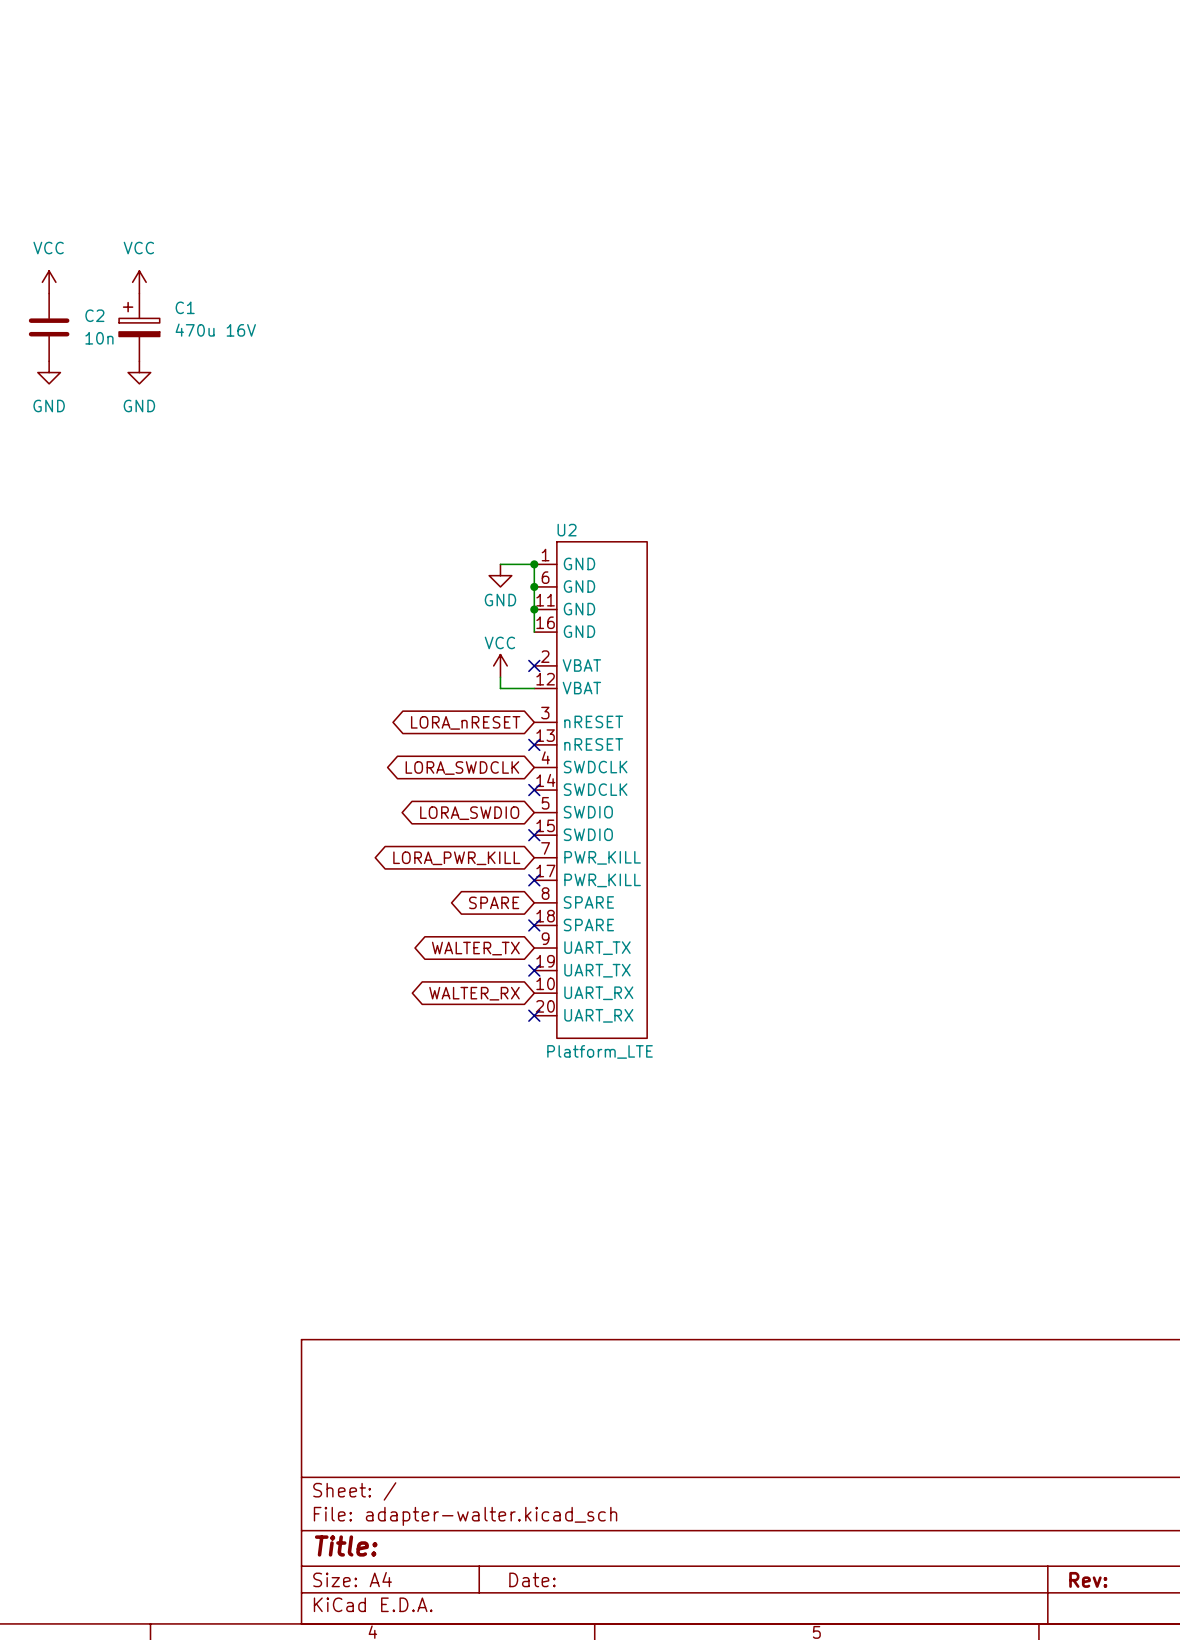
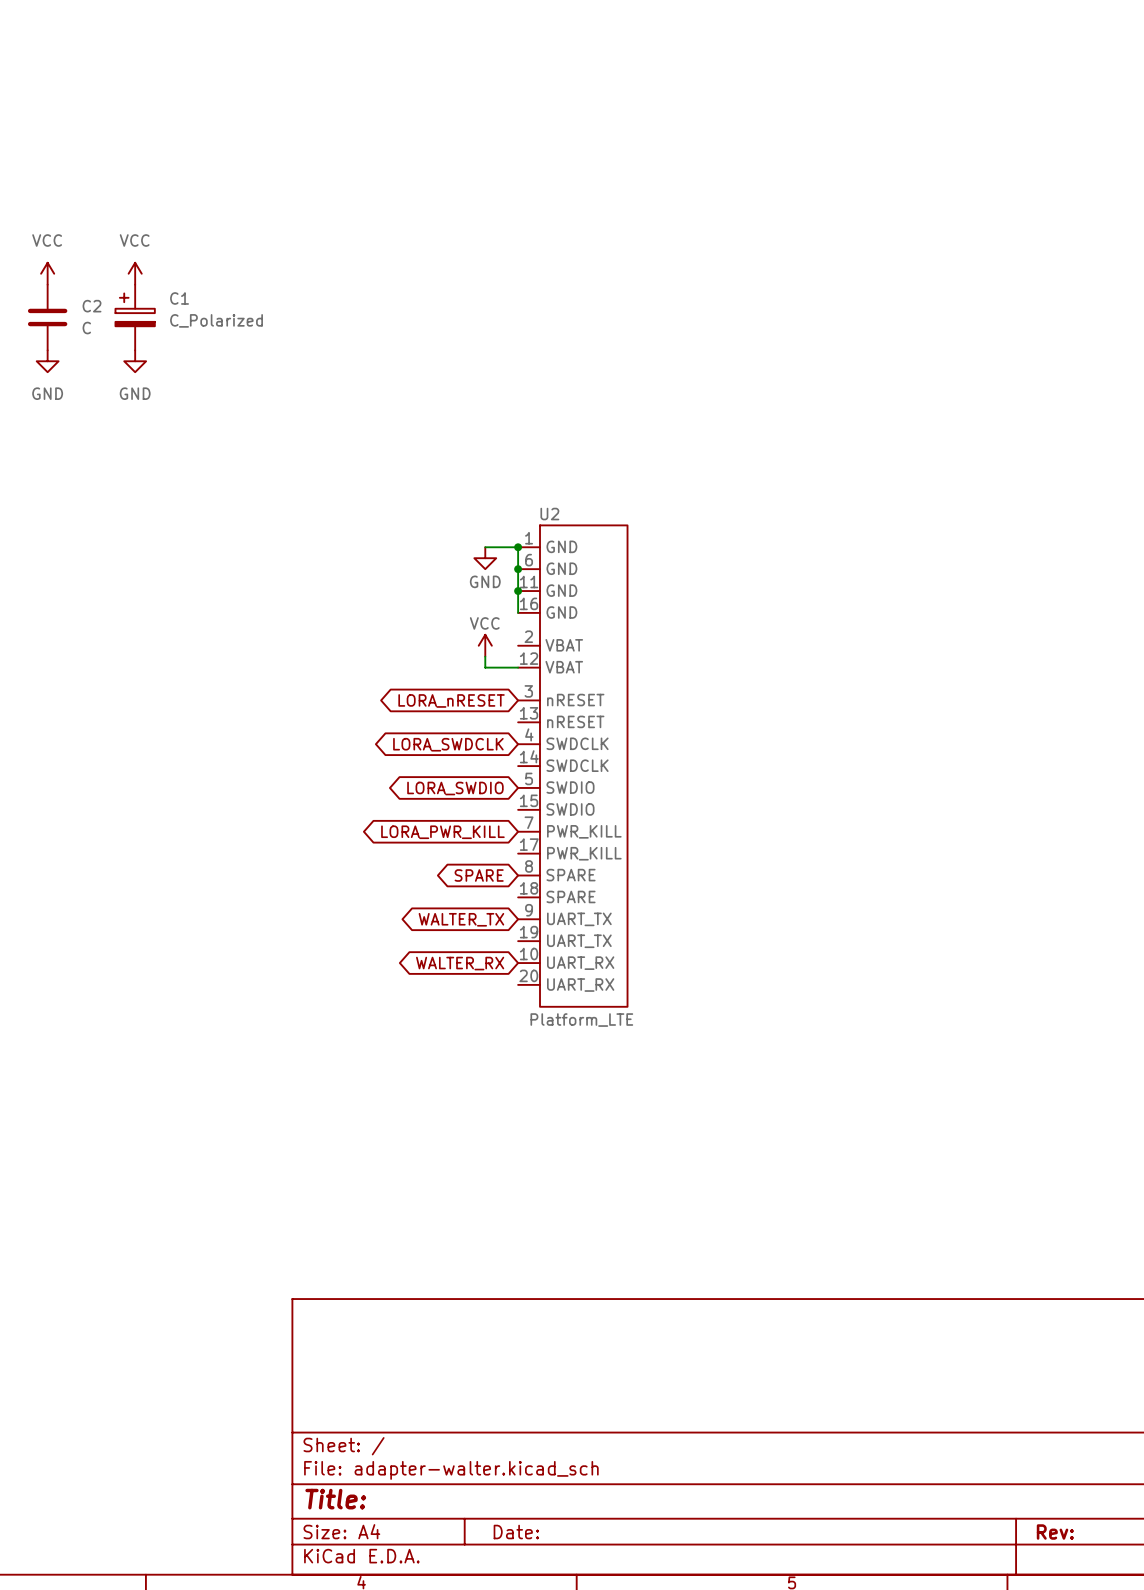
C1 value: 470u 16V (215, 330) -> C_Polarized (216, 320)
C2 value: 10n (99, 338) -> C (86, 328)
no-connect mark: (534, 665) -> none
no-connect mark: (534, 744) -> none
no-connect mark: (534, 790) -> none
no-connect mark: (534, 835) -> none
no-connect mark: (534, 880) -> none
no-connect mark: (534, 925) -> none
no-connect mark: (534, 970) -> none
no-connect mark: (534, 1015) -> none

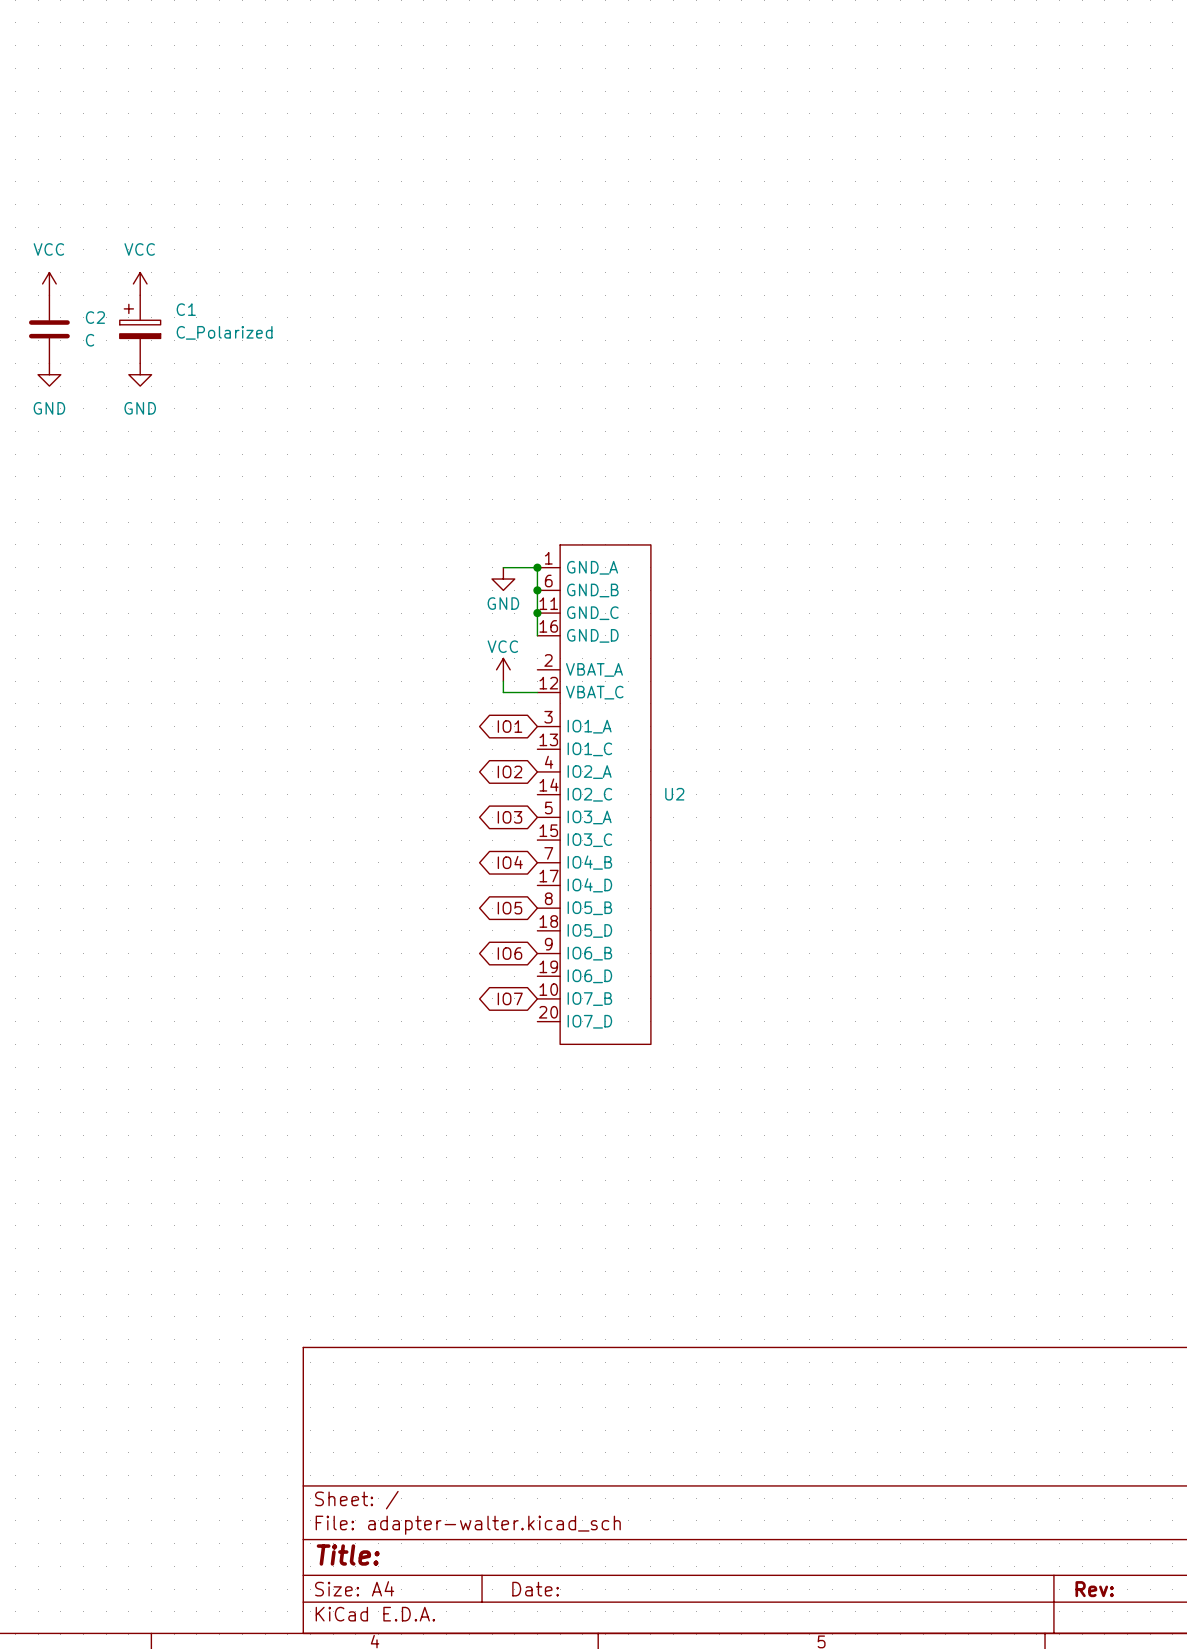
U2 name position: U2 (549, 514) -> U2 (674, 794)
U2 symbol: [518, 525, 628, 1007] -> [537, 544, 651, 1045]
global label: LORA_nRESET (451, 700) -> IO1 (509, 726)
global label: LORA_SWDCLK (448, 744) -> IO2 (509, 771)
global label: LORA_SWDIO (455, 788) -> IO3 (509, 817)
global label: LORA_PWR_KILL (442, 832) -> IO4 (510, 862)
global label: SPARE (479, 875) -> IO5 (509, 908)
global label: WALTER_TX (461, 919) -> IO6 (509, 953)
global label: WALTER_RX (460, 963) -> IO7 (510, 998)
U2 value: Platform_LTE (581, 1020) -> none

